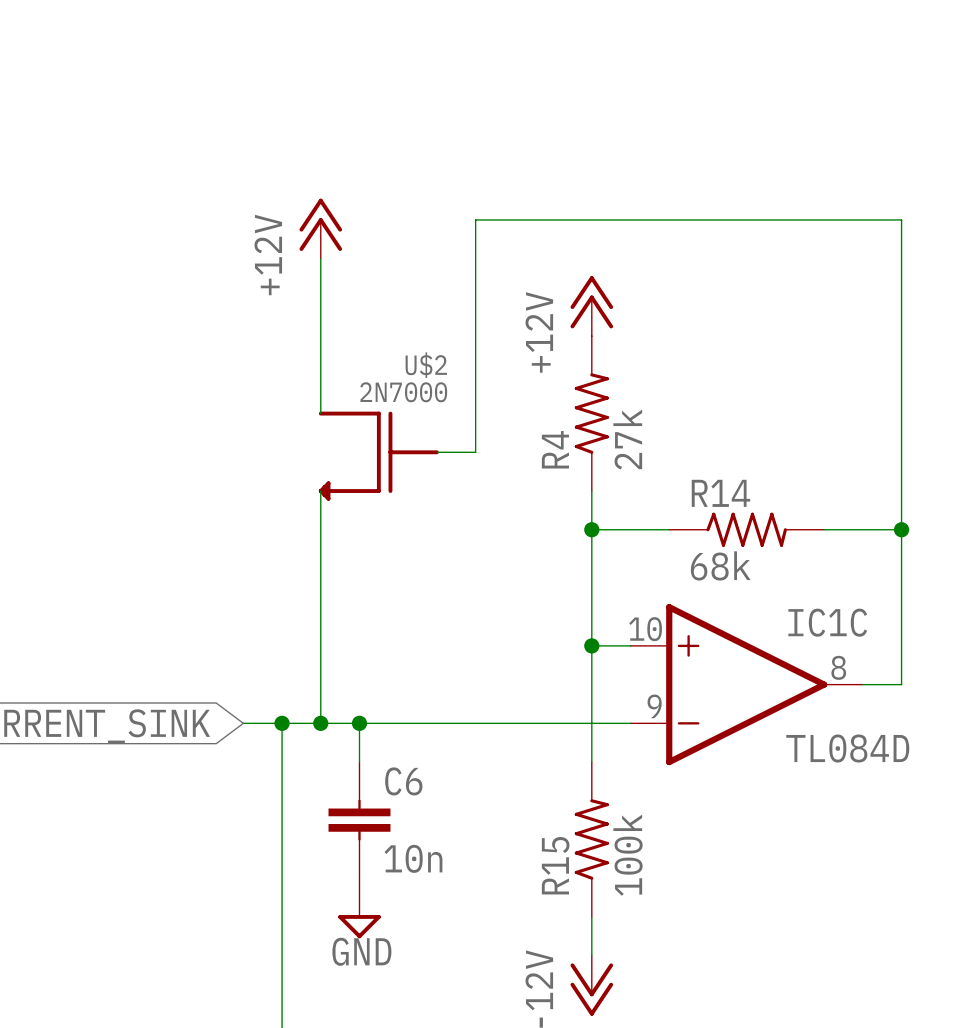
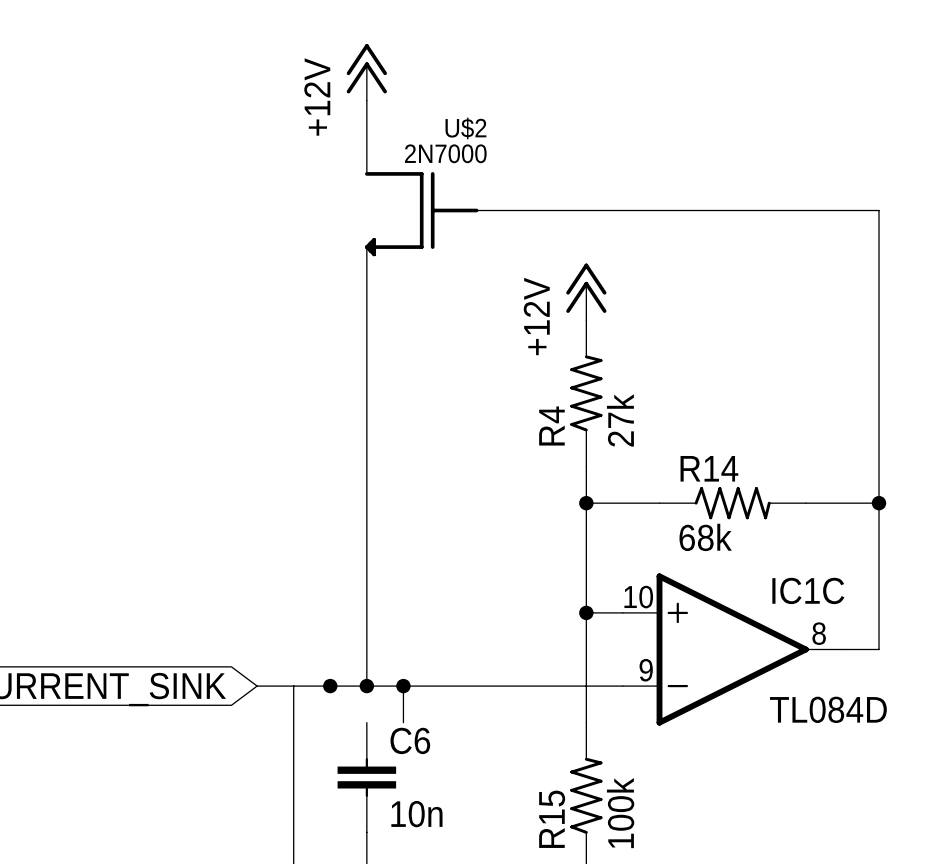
wire: none -> (366, 100) (366, 173)
wire: (475, 219) (475, 452) (436, 452) -> none
power symbol position: +12V (320, 228) -> +12V (366, 72)
wire: (320, 258) (320, 413) -> none
U$2 position: (378, 456) -> (421, 214)
wire: (320, 491) (320, 723) -> none
junction: (282, 723) -> none
wire: (359, 723) (359, 762) -> (366, 686) (366, 247)
wire: none -> (403, 686) (403, 722)
junction: none -> (403, 686)

